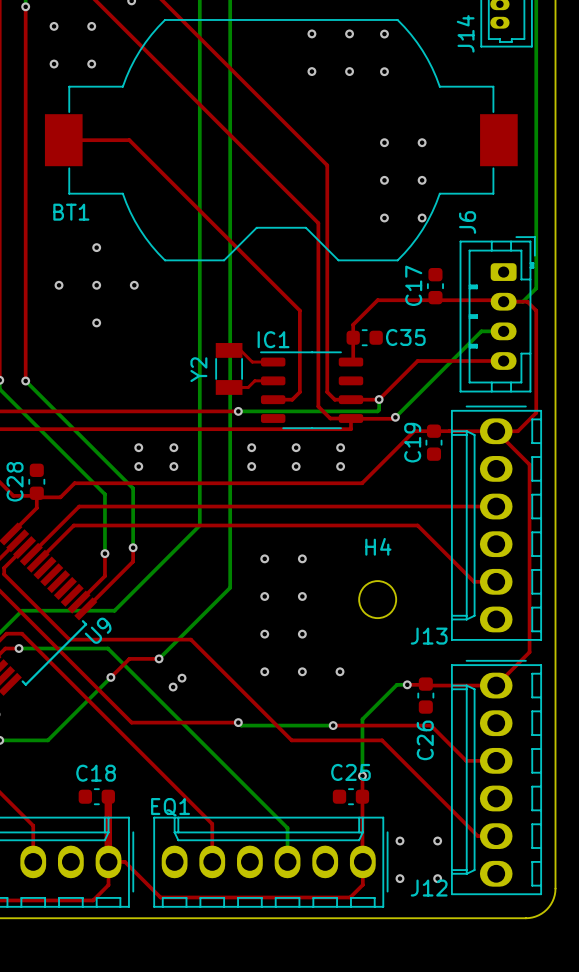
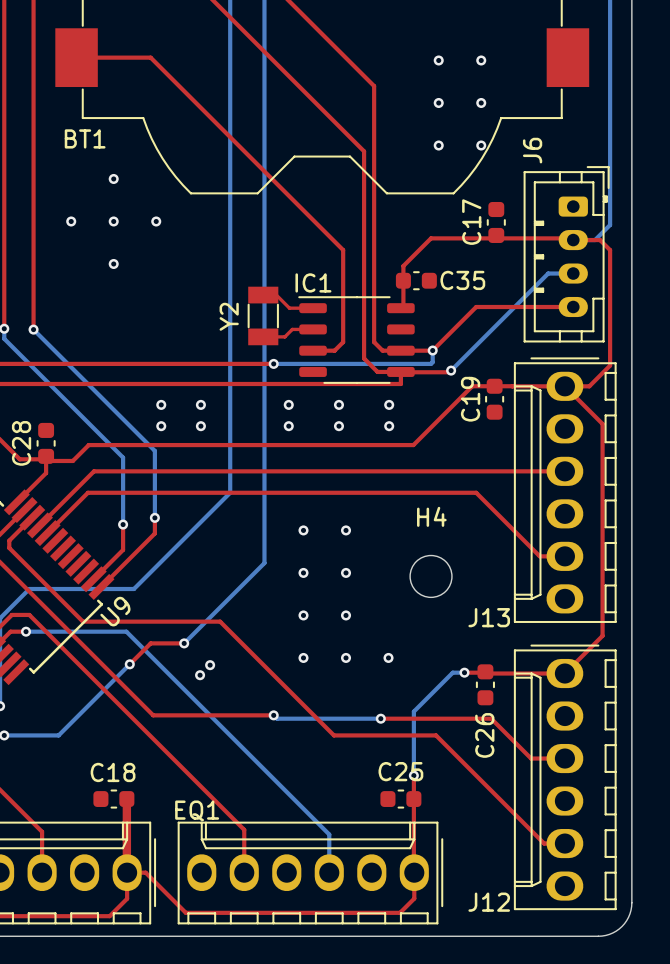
via: (400, 840) -> none
via: (437, 840) -> none
via: (400, 878) -> none
via: (437, 878) -> none

